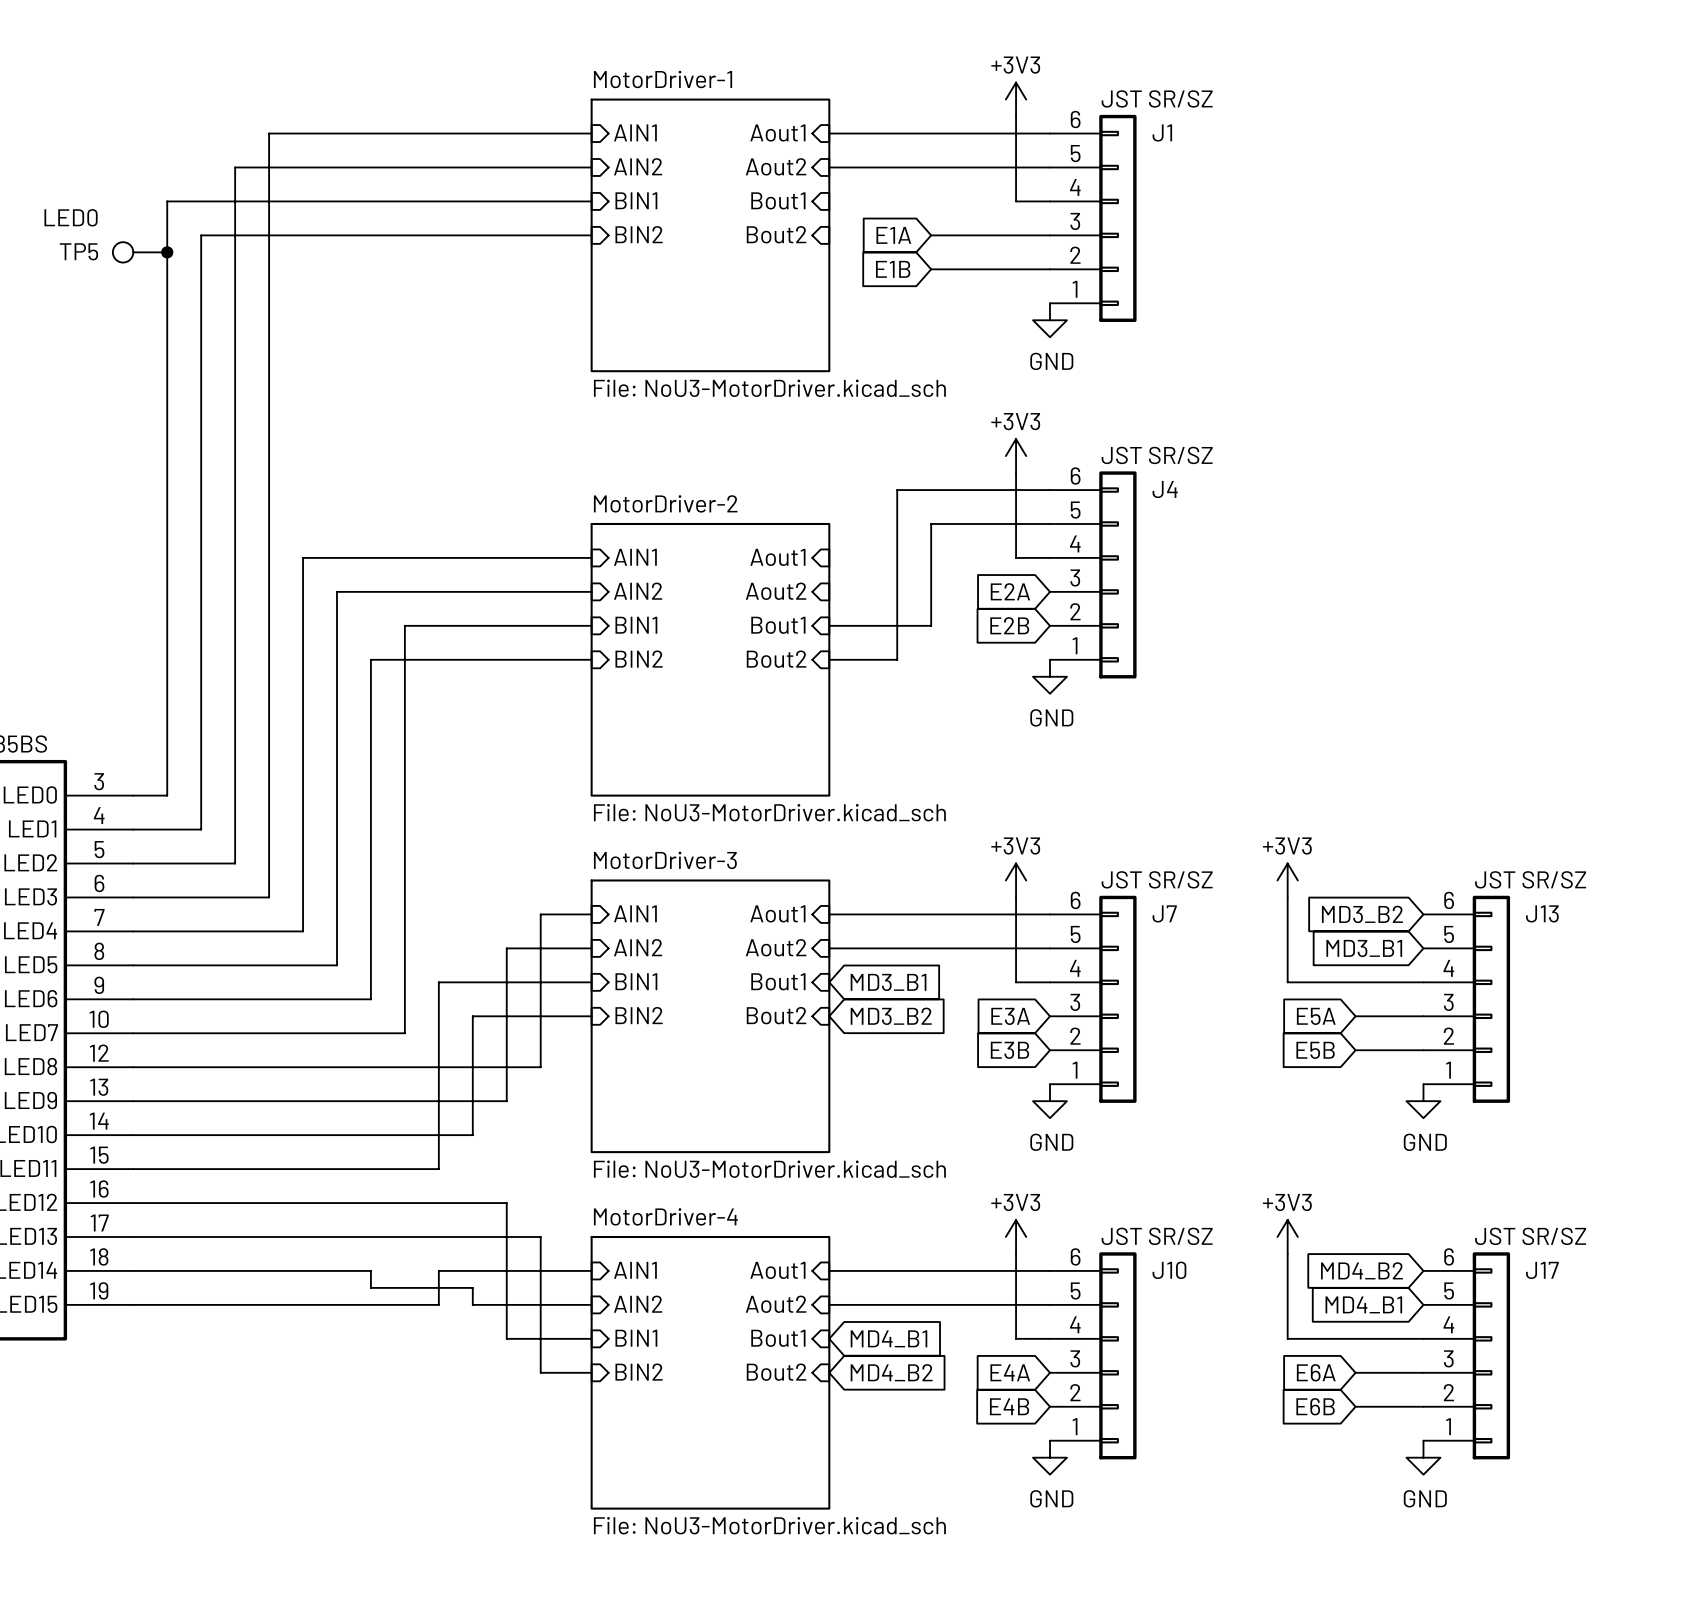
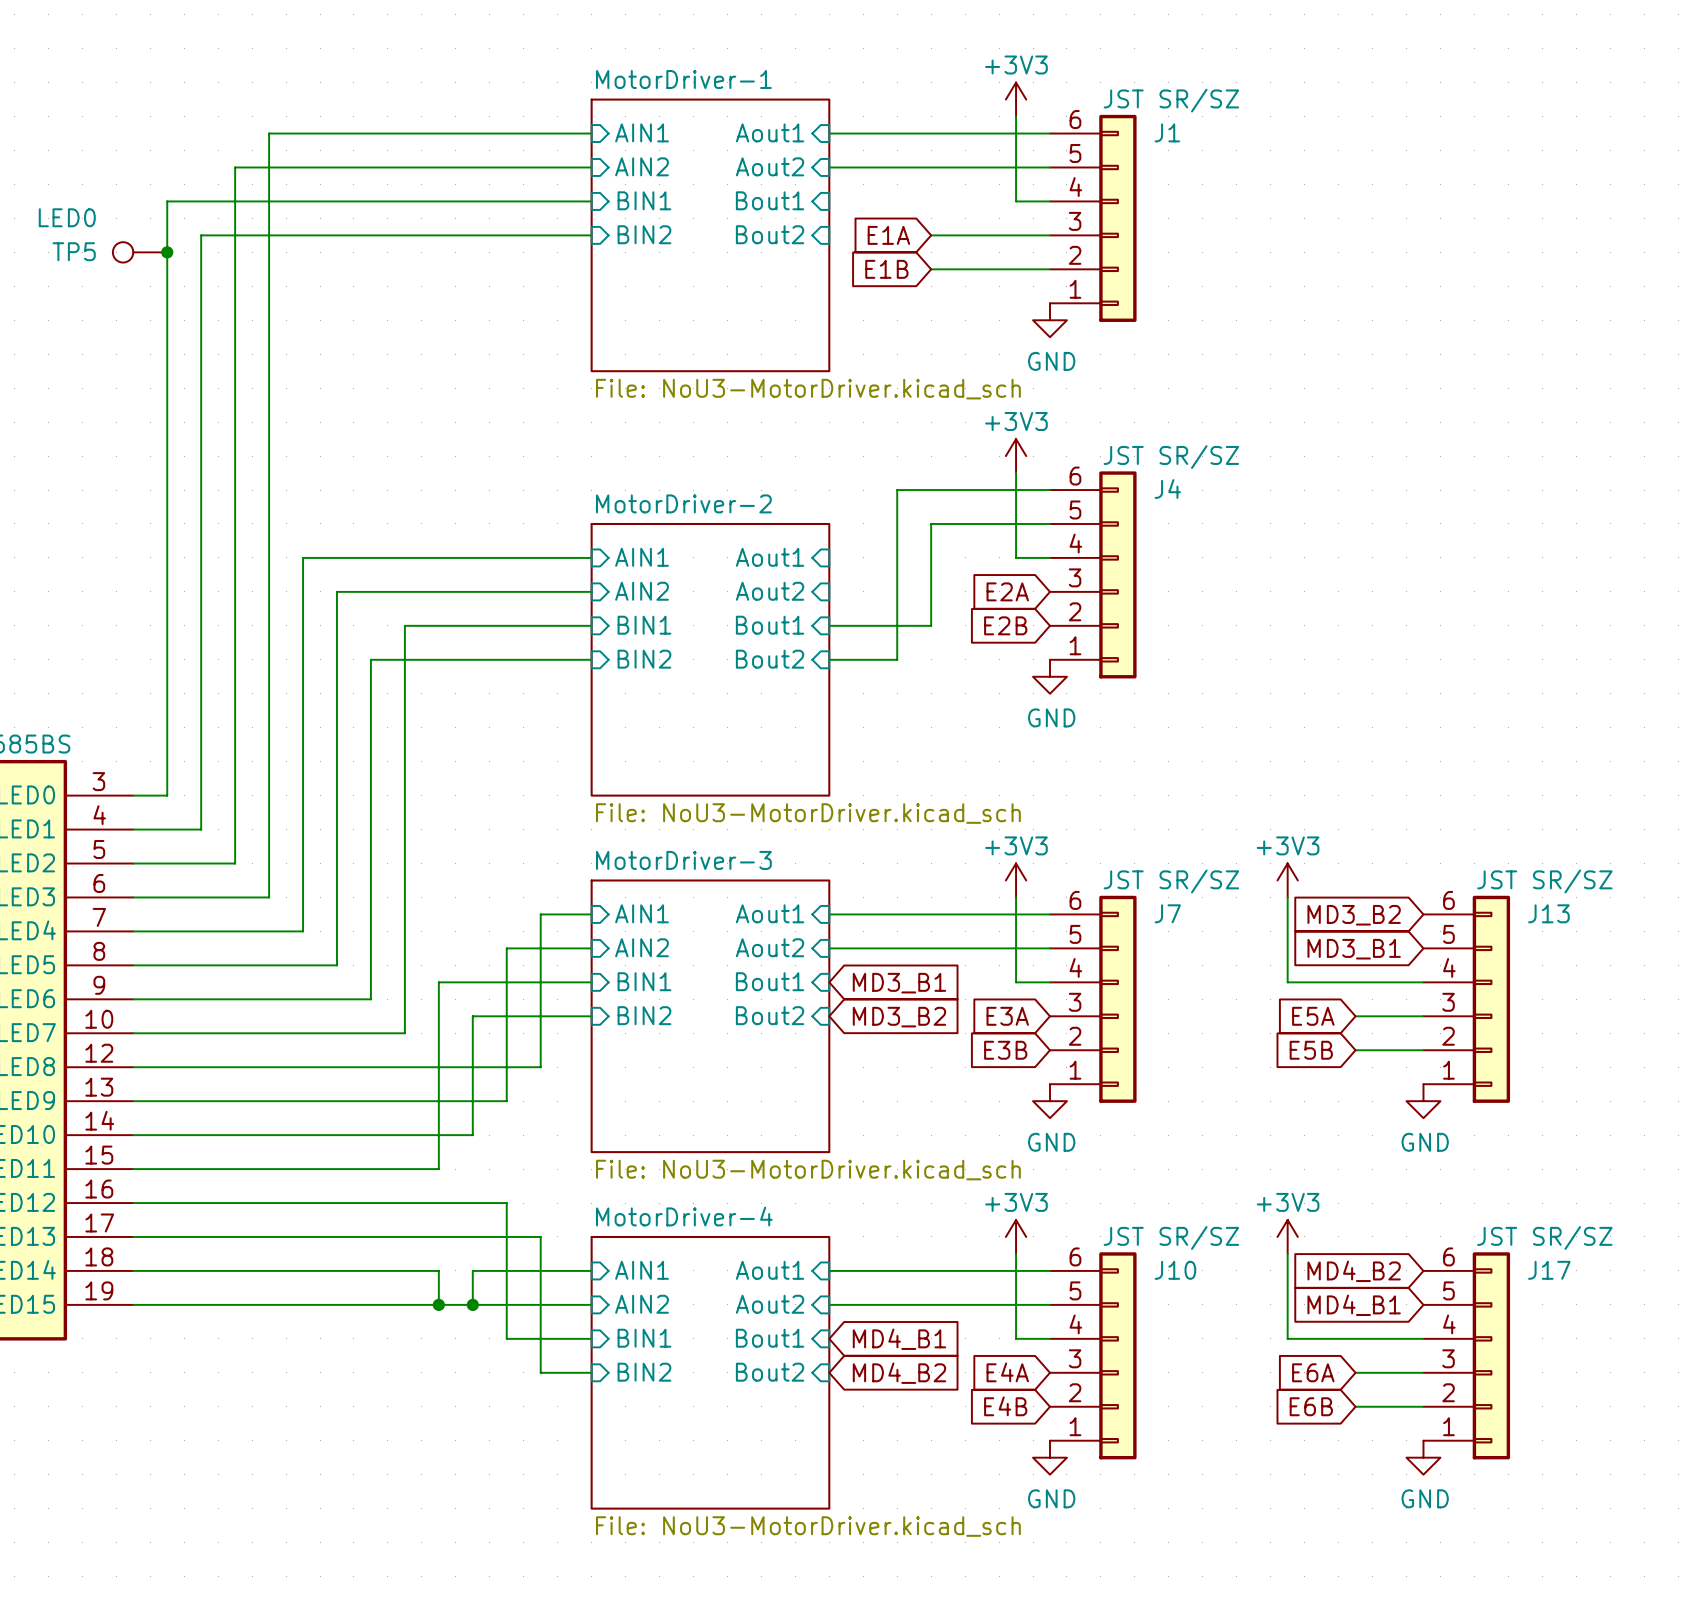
wire: (370, 1270) (370, 1287) (472, 1287) -> (370, 1270) (438, 1270)
wire: (438, 1270) (472, 1270) -> (472, 1287) (472, 1270)
wire: none -> (438, 1304) (472, 1304)
junction: none -> (438, 1304)
junction: none -> (472, 1304)

